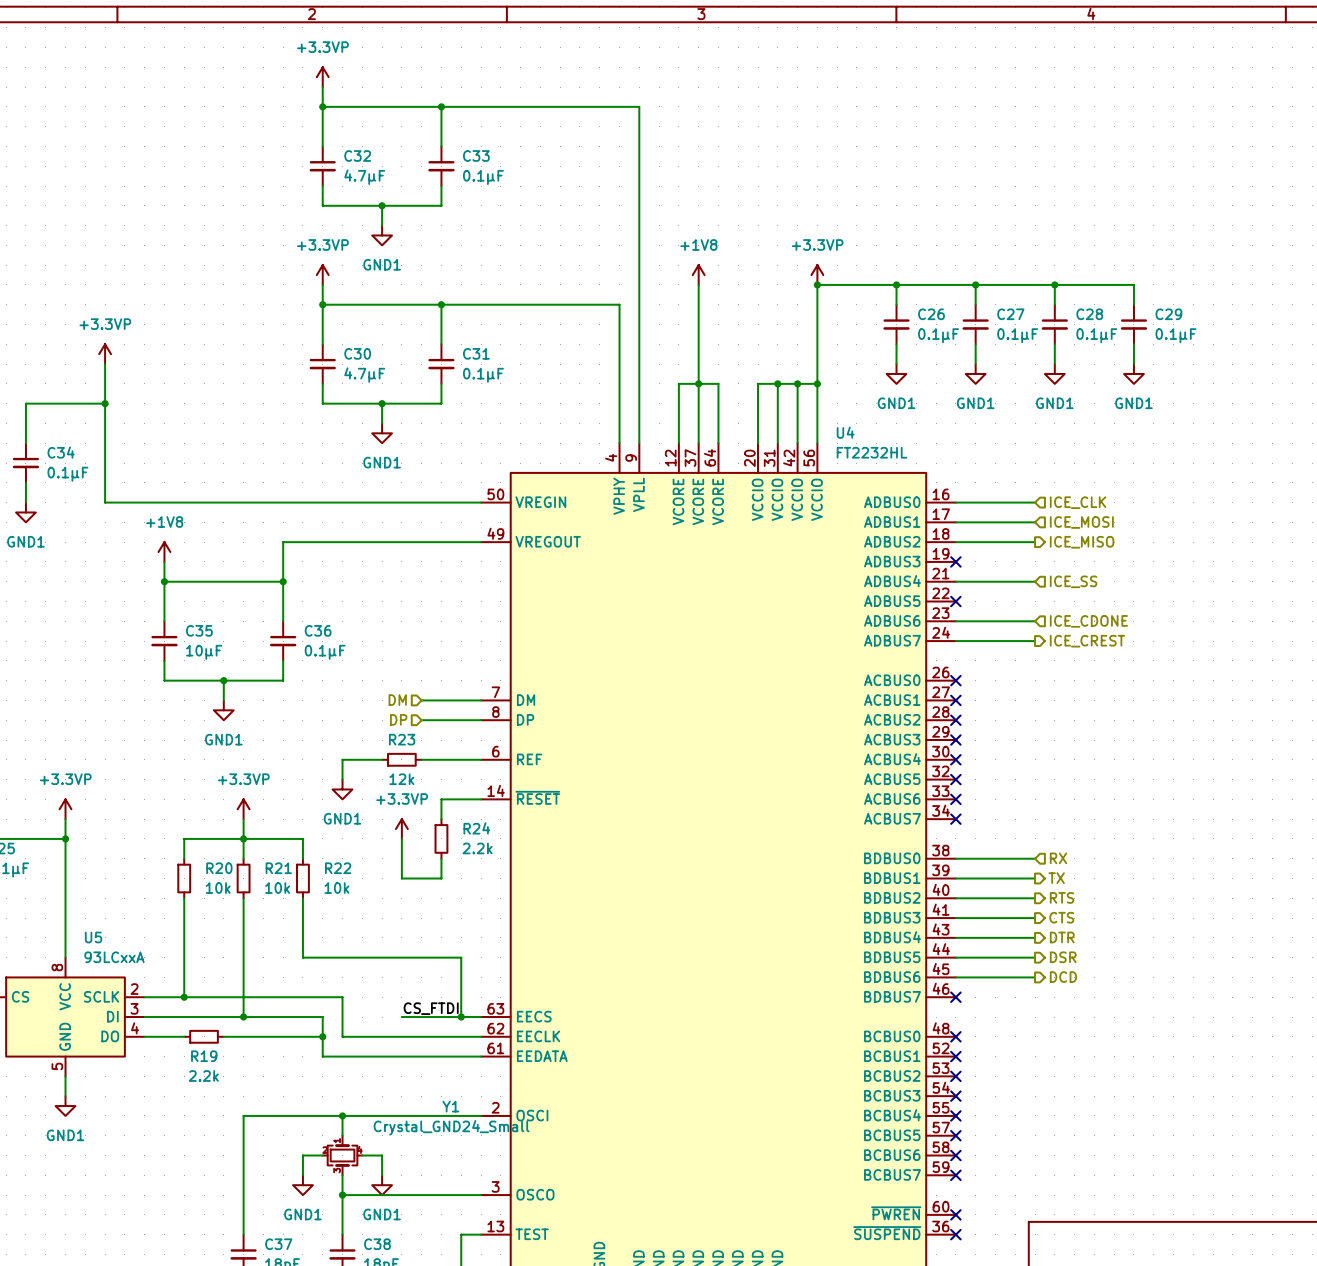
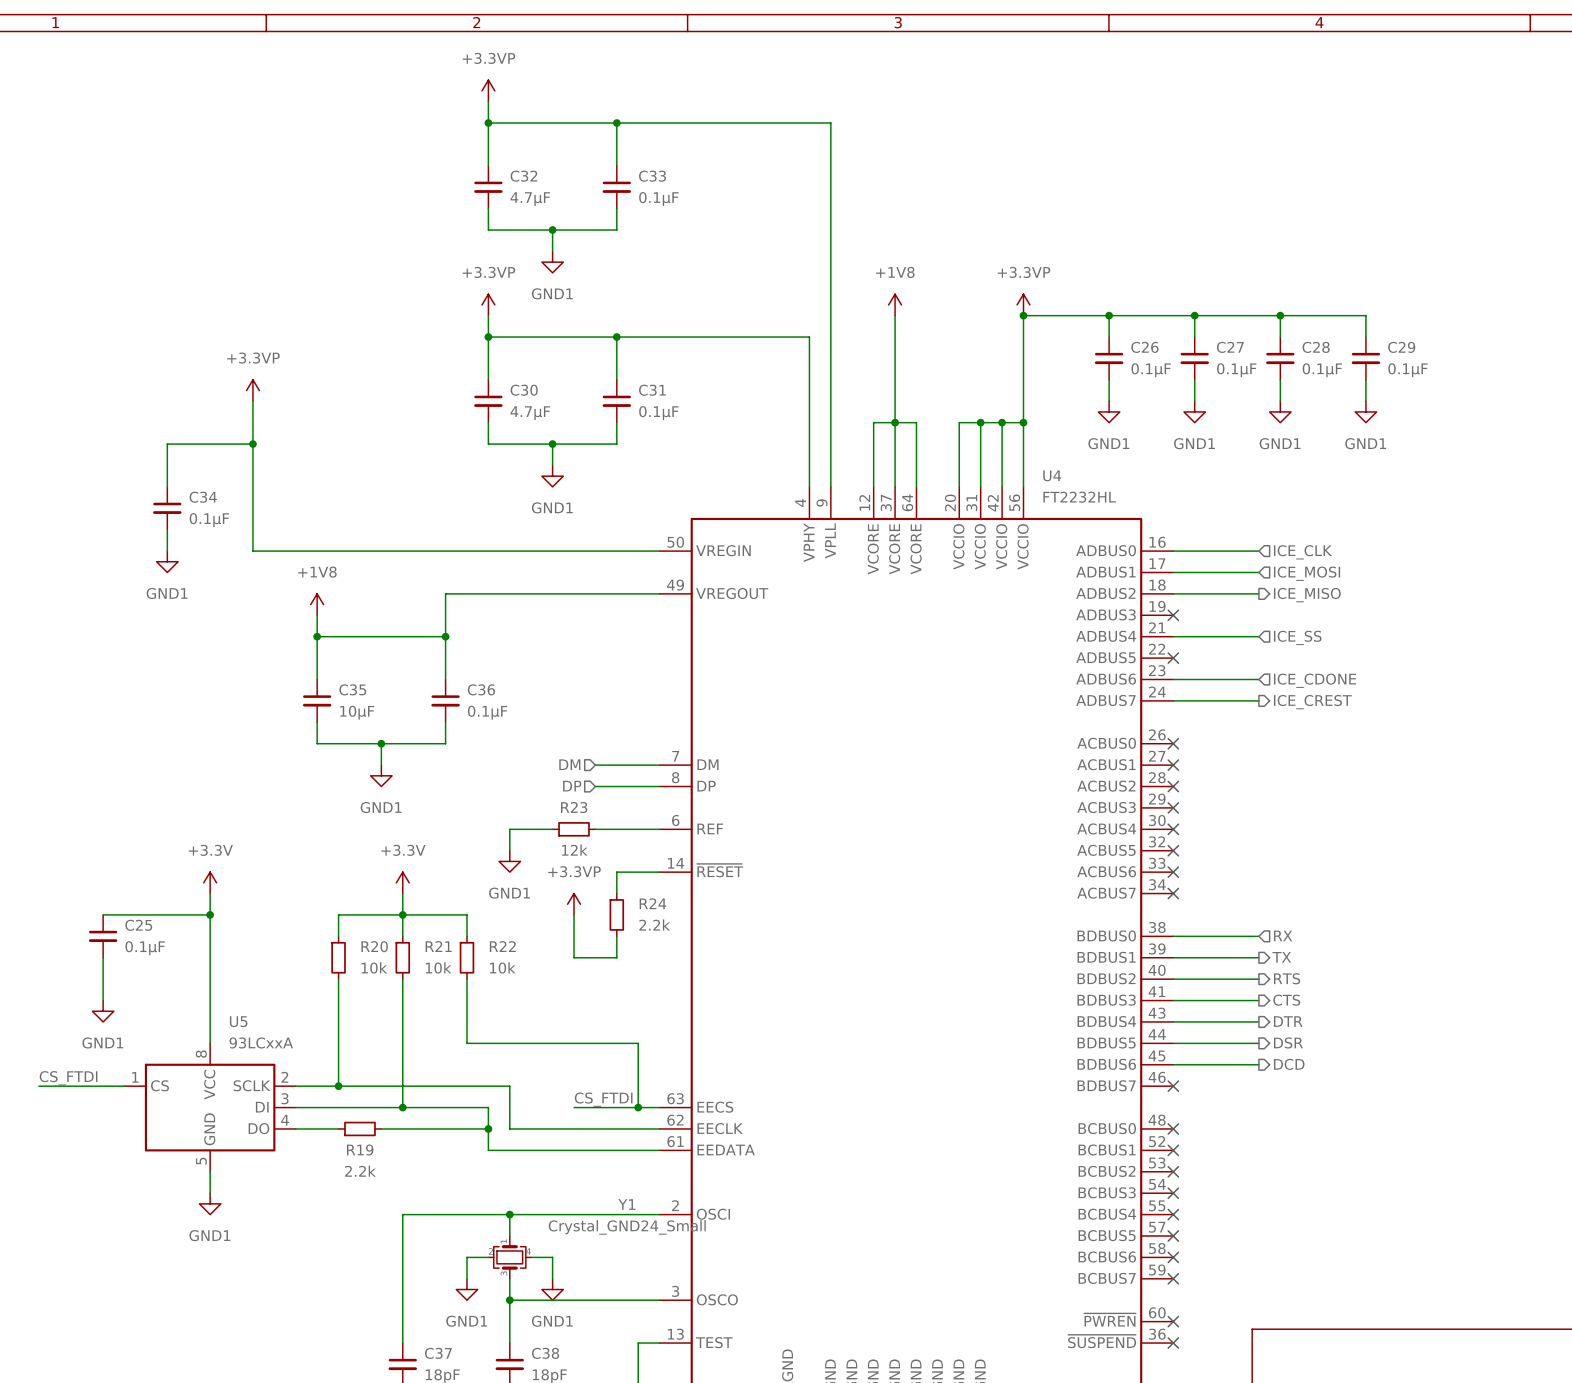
power symbol: +3.3VP (65, 809) -> +3.3V (210, 882)
power symbol: +3.3VP (243, 809) -> +3.3V (402, 882)

